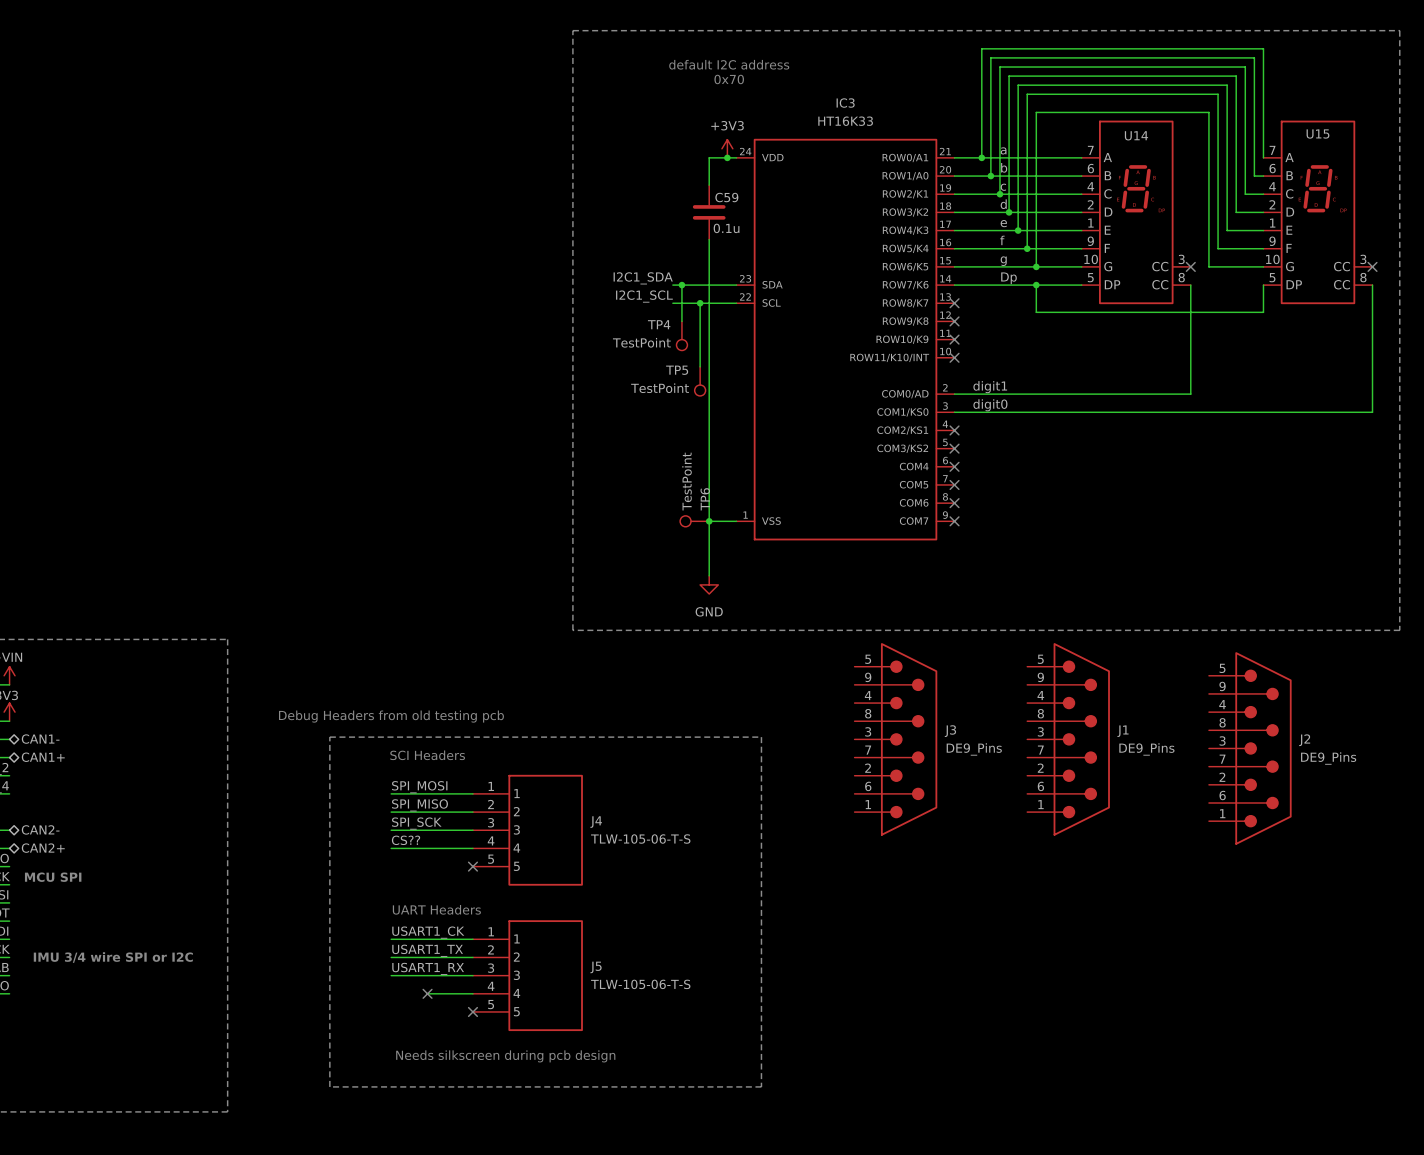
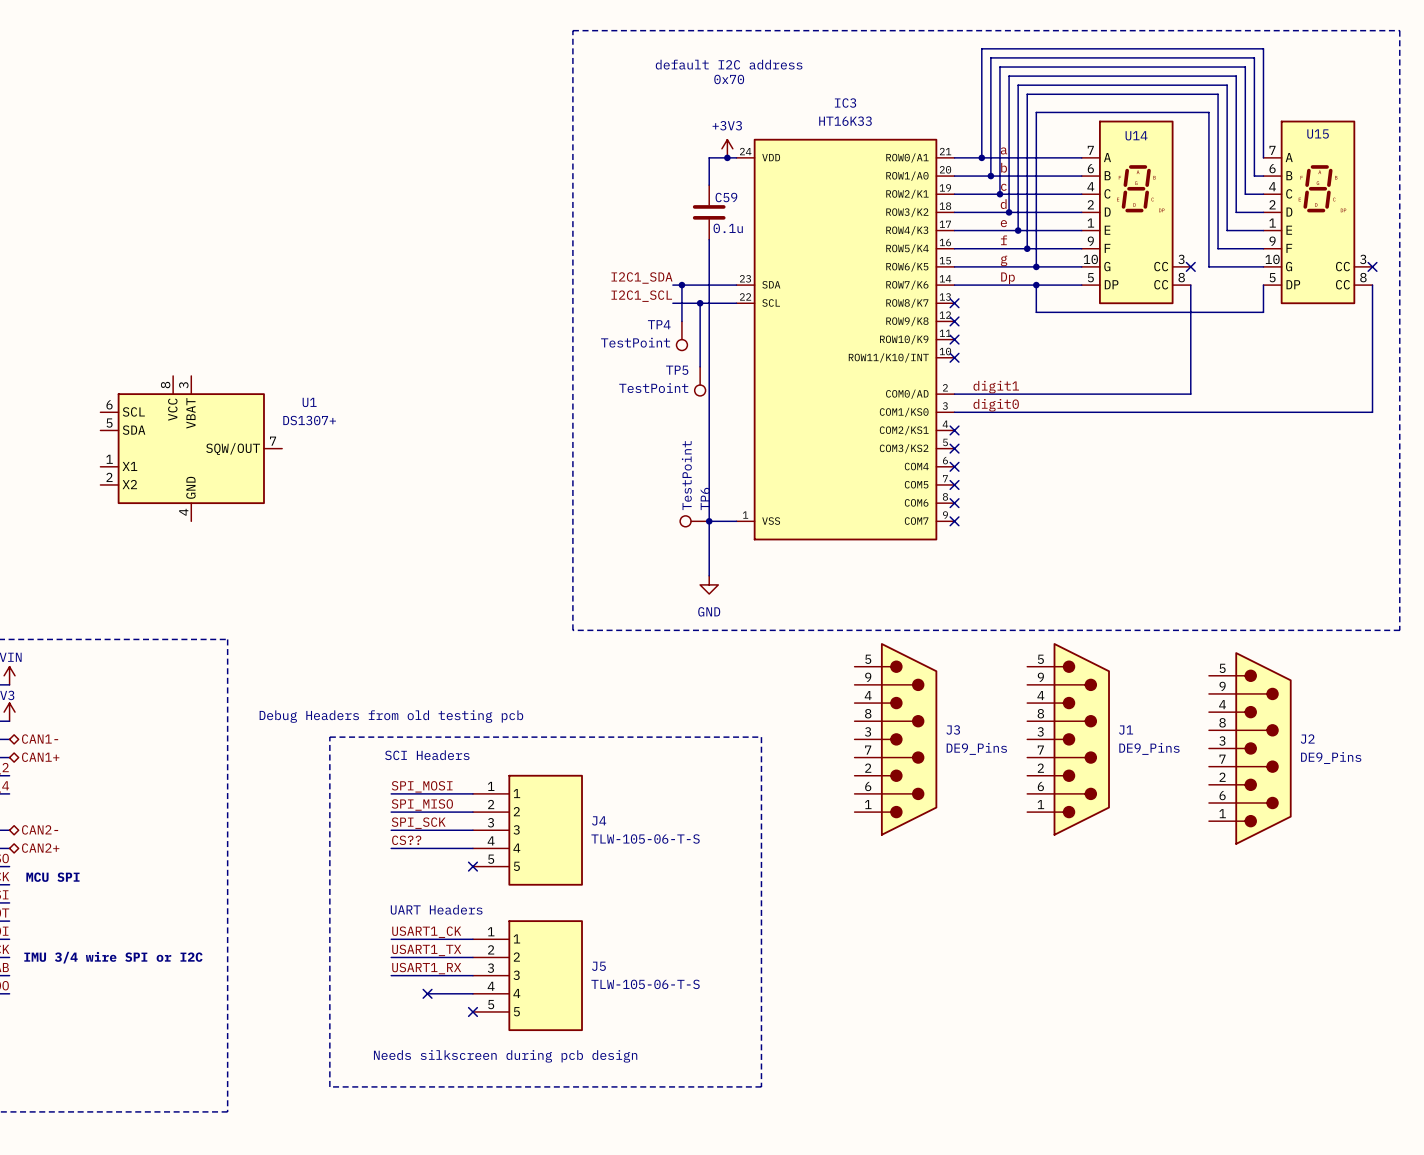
U1: none -> DS1307+ (191, 448)

